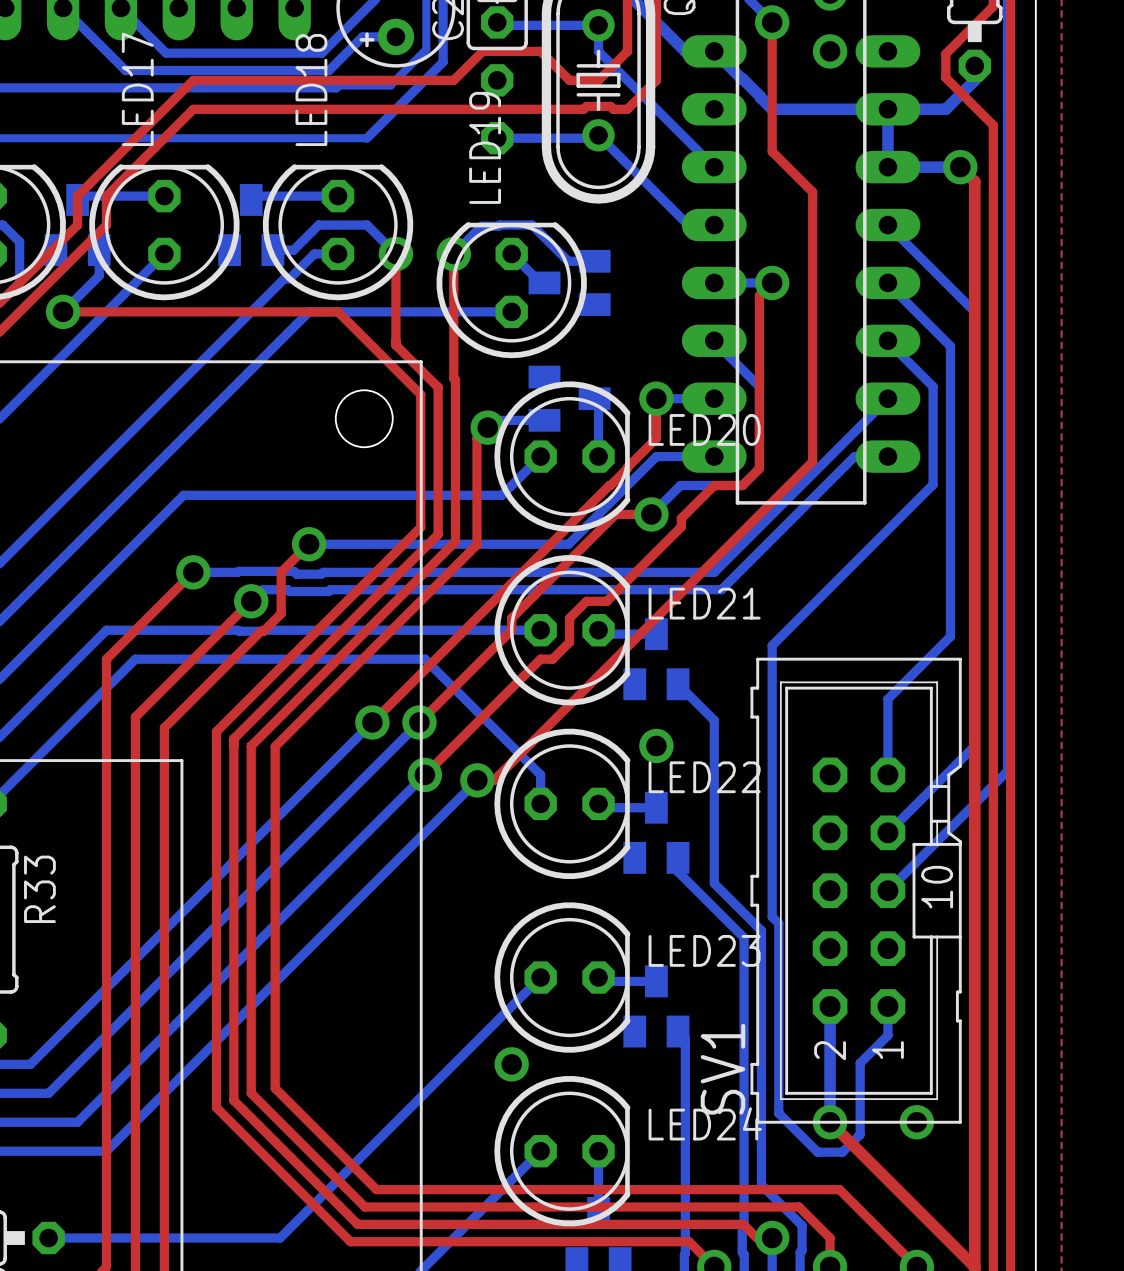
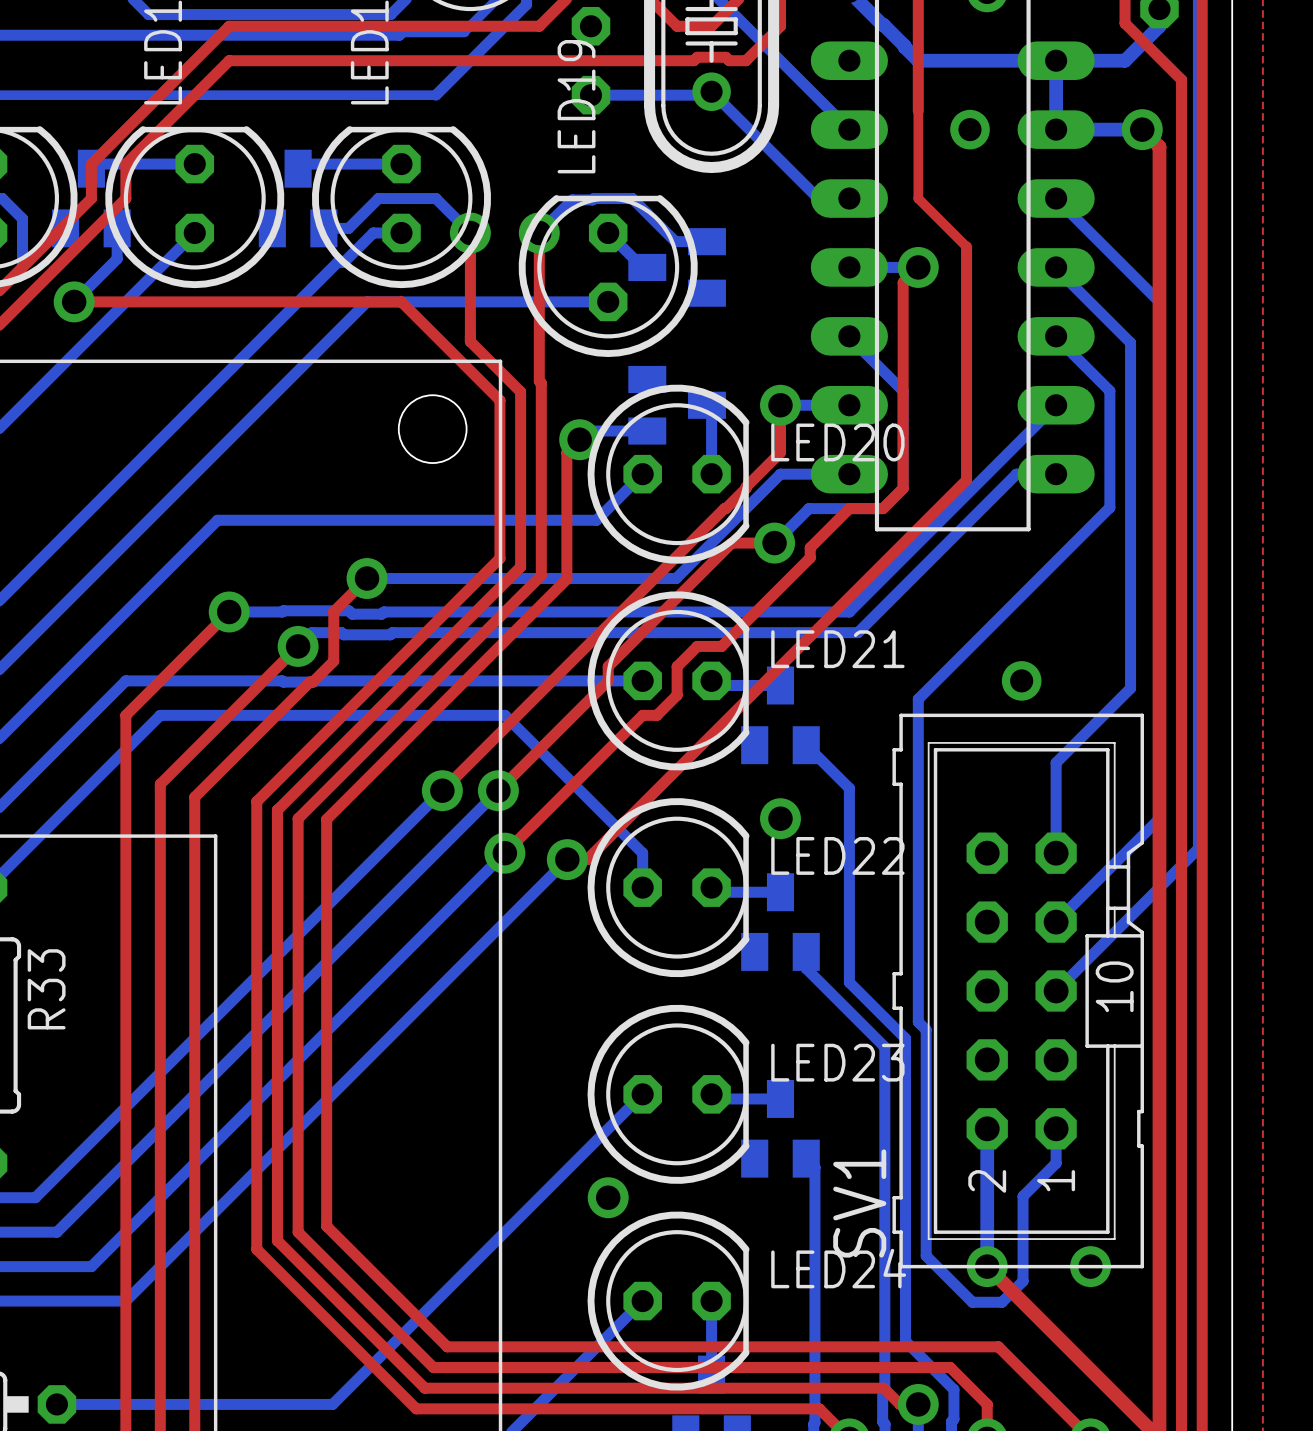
top track: (772, 151) (812, 192) (812, 265) -> (918, 111) (918, 198) (966, 246)
via: none -> (969, 129)
via: none -> (1021, 680)

